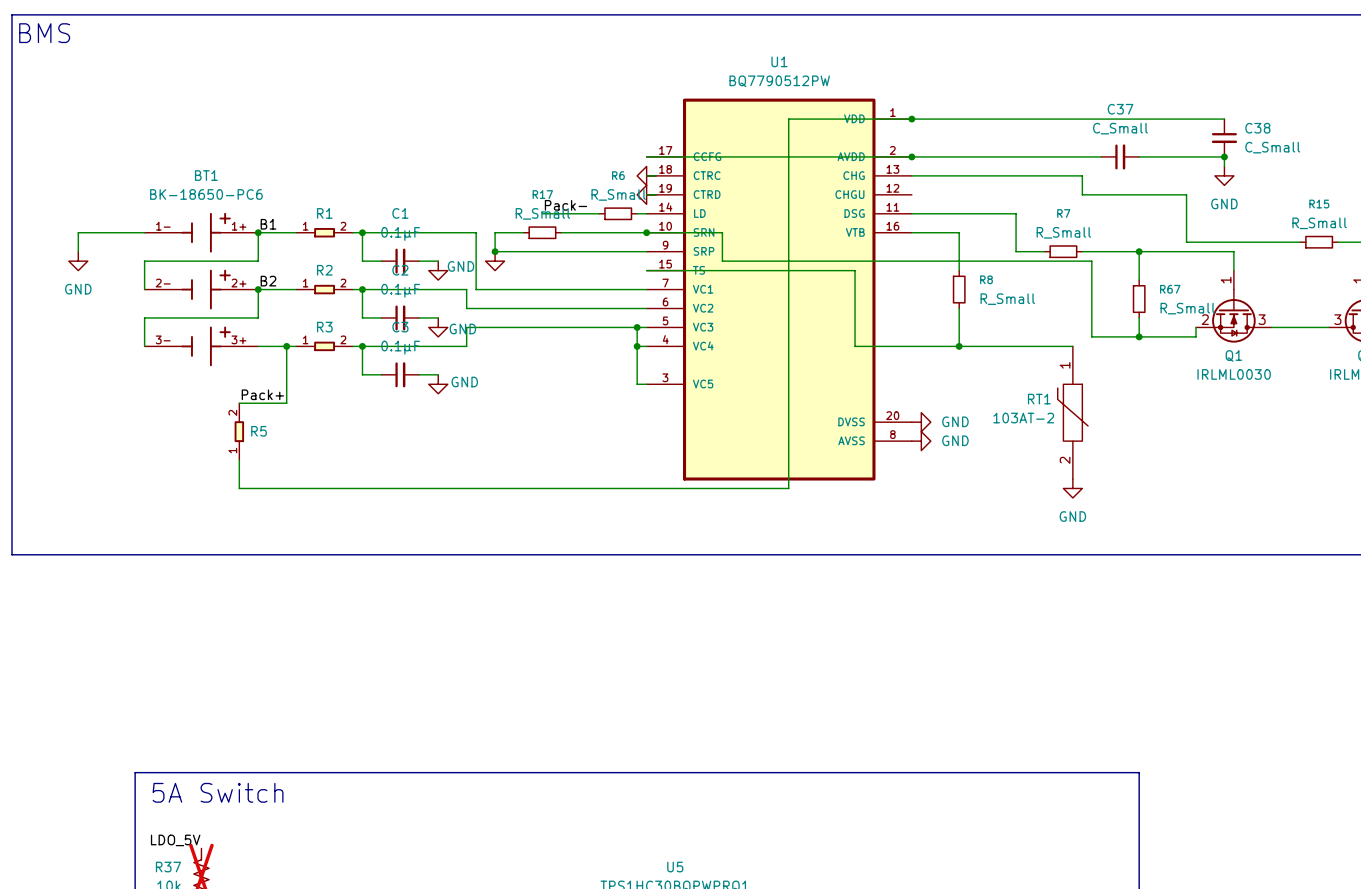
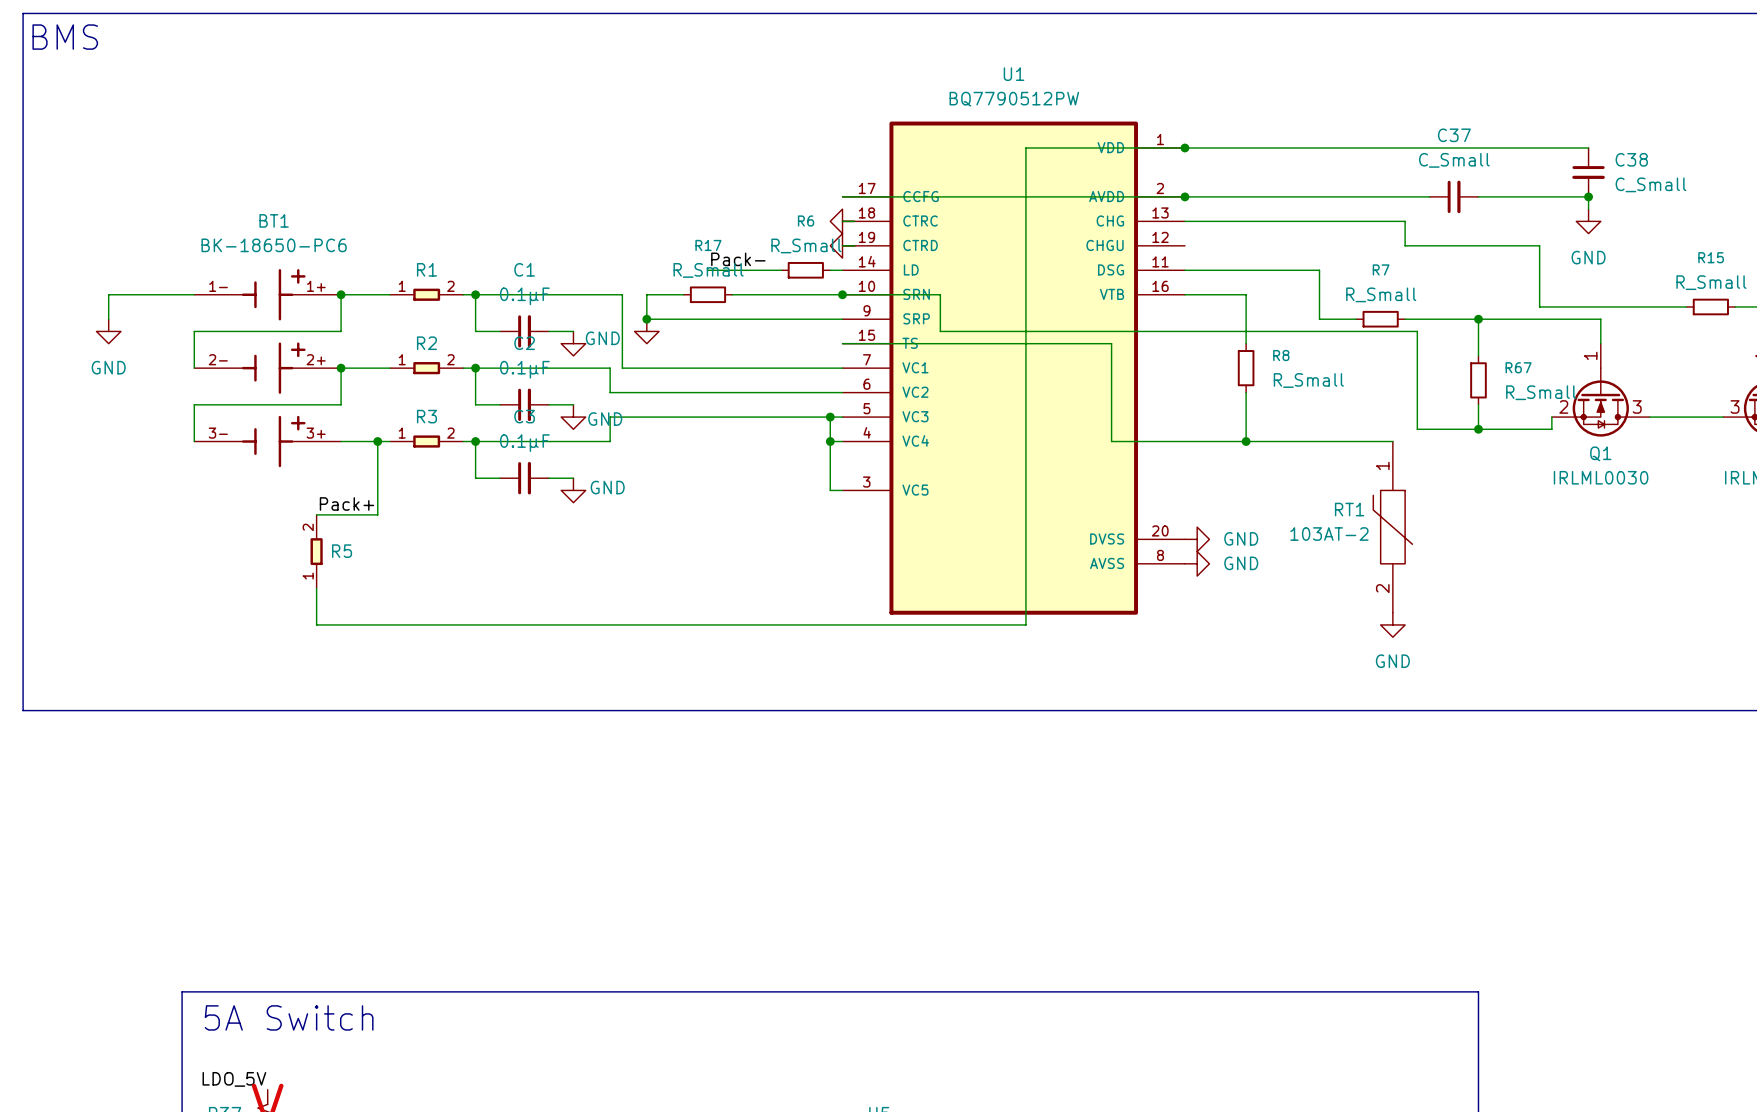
label: B1 (268, 224) -> none
label: B2 (268, 281) -> none

